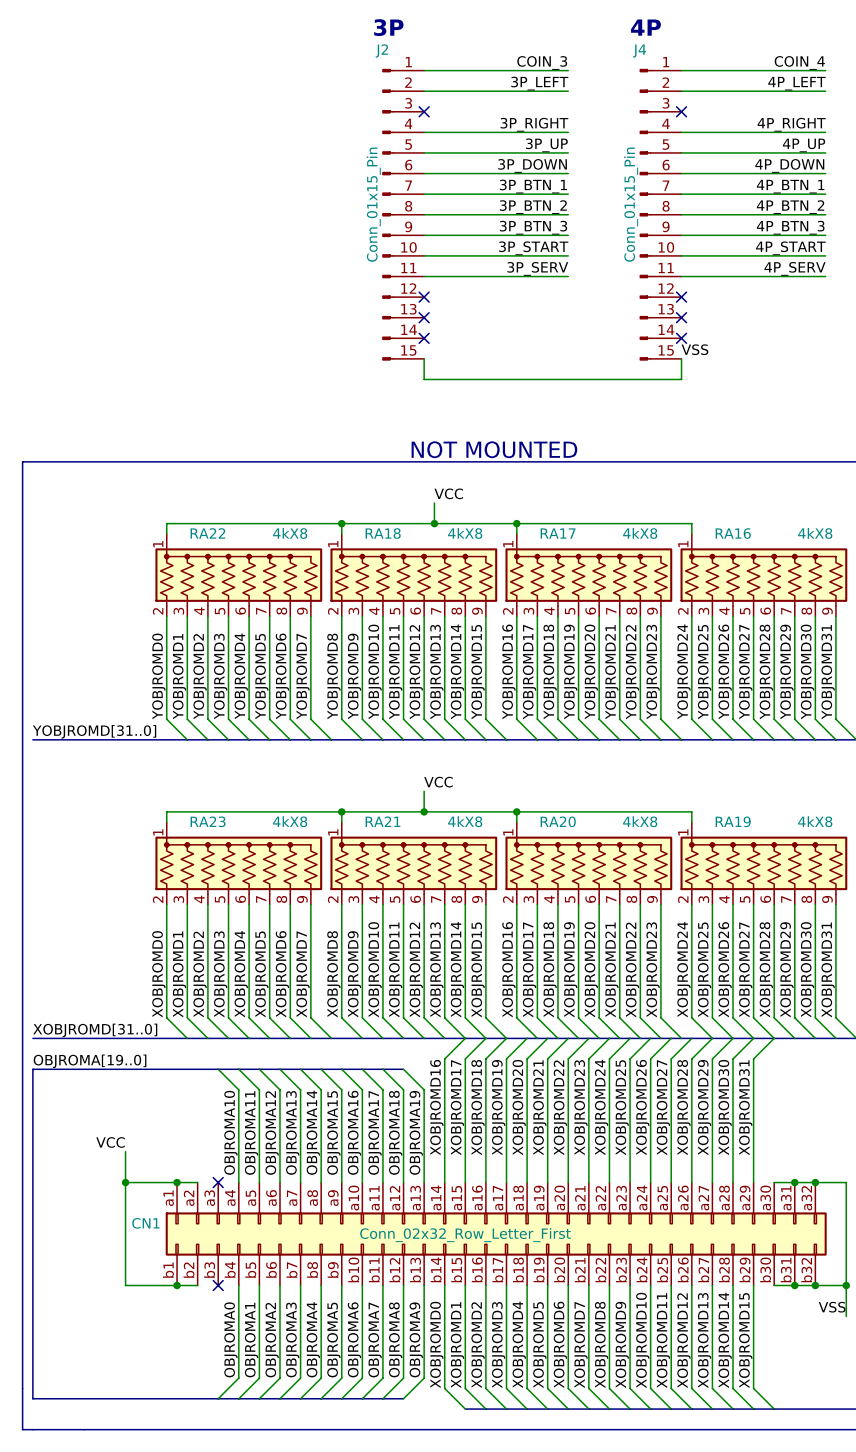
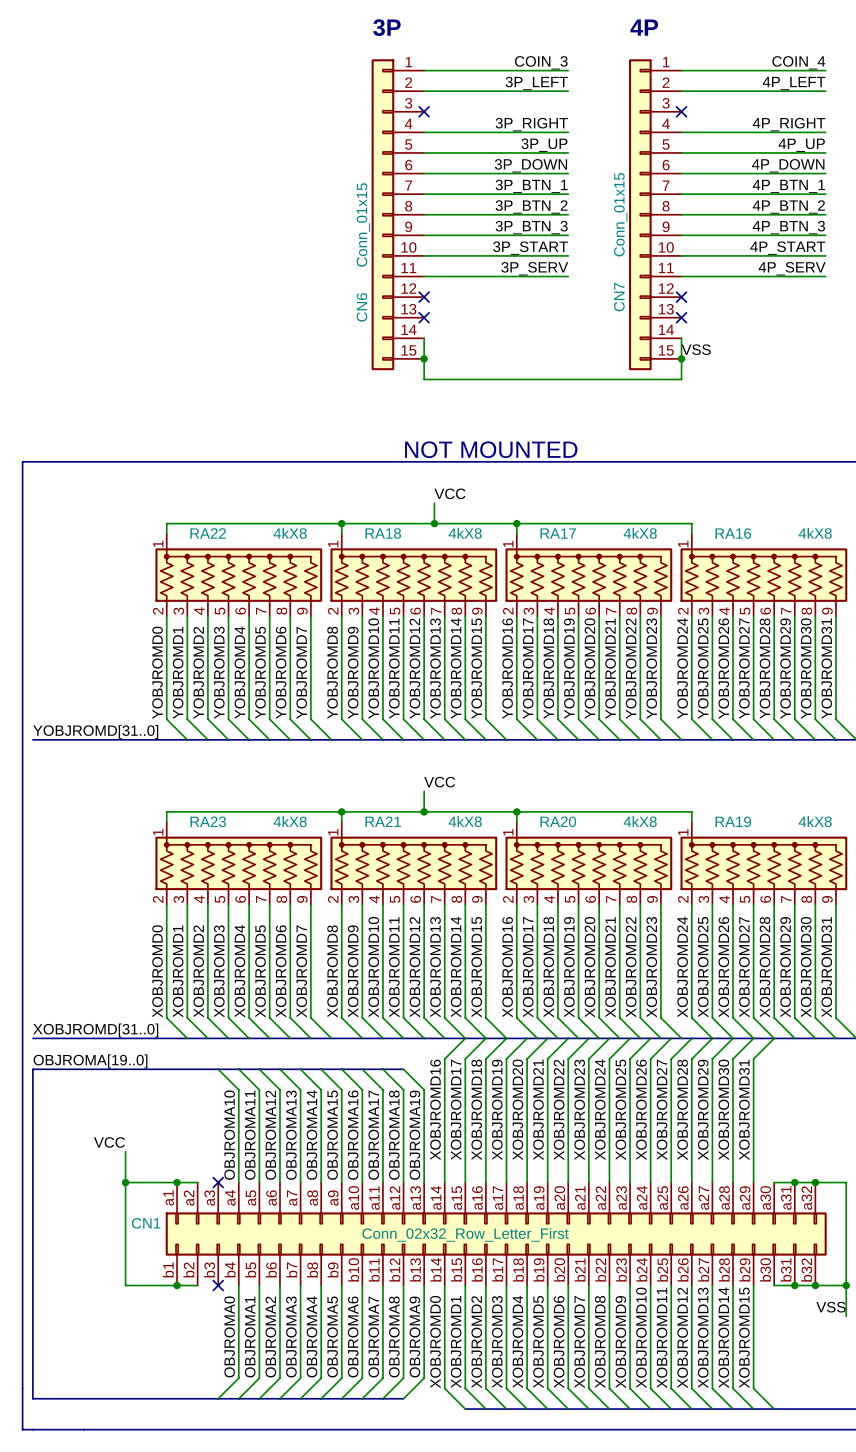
CN6: none -> Conn_01x15 (397, 214)
J2: Conn_01x15_Pin (403, 214) -> none
CN7: none -> Conn_01x15 (655, 214)
J4: Conn_01x15_Pin (660, 214) -> none
wire: none -> (424, 338) (424, 358)
no-connect mark: (424, 338) -> none
wire: none -> (681, 338) (681, 358)
no-connect mark: (681, 338) -> none
junction: none -> (424, 358)
junction: none -> (681, 358)

